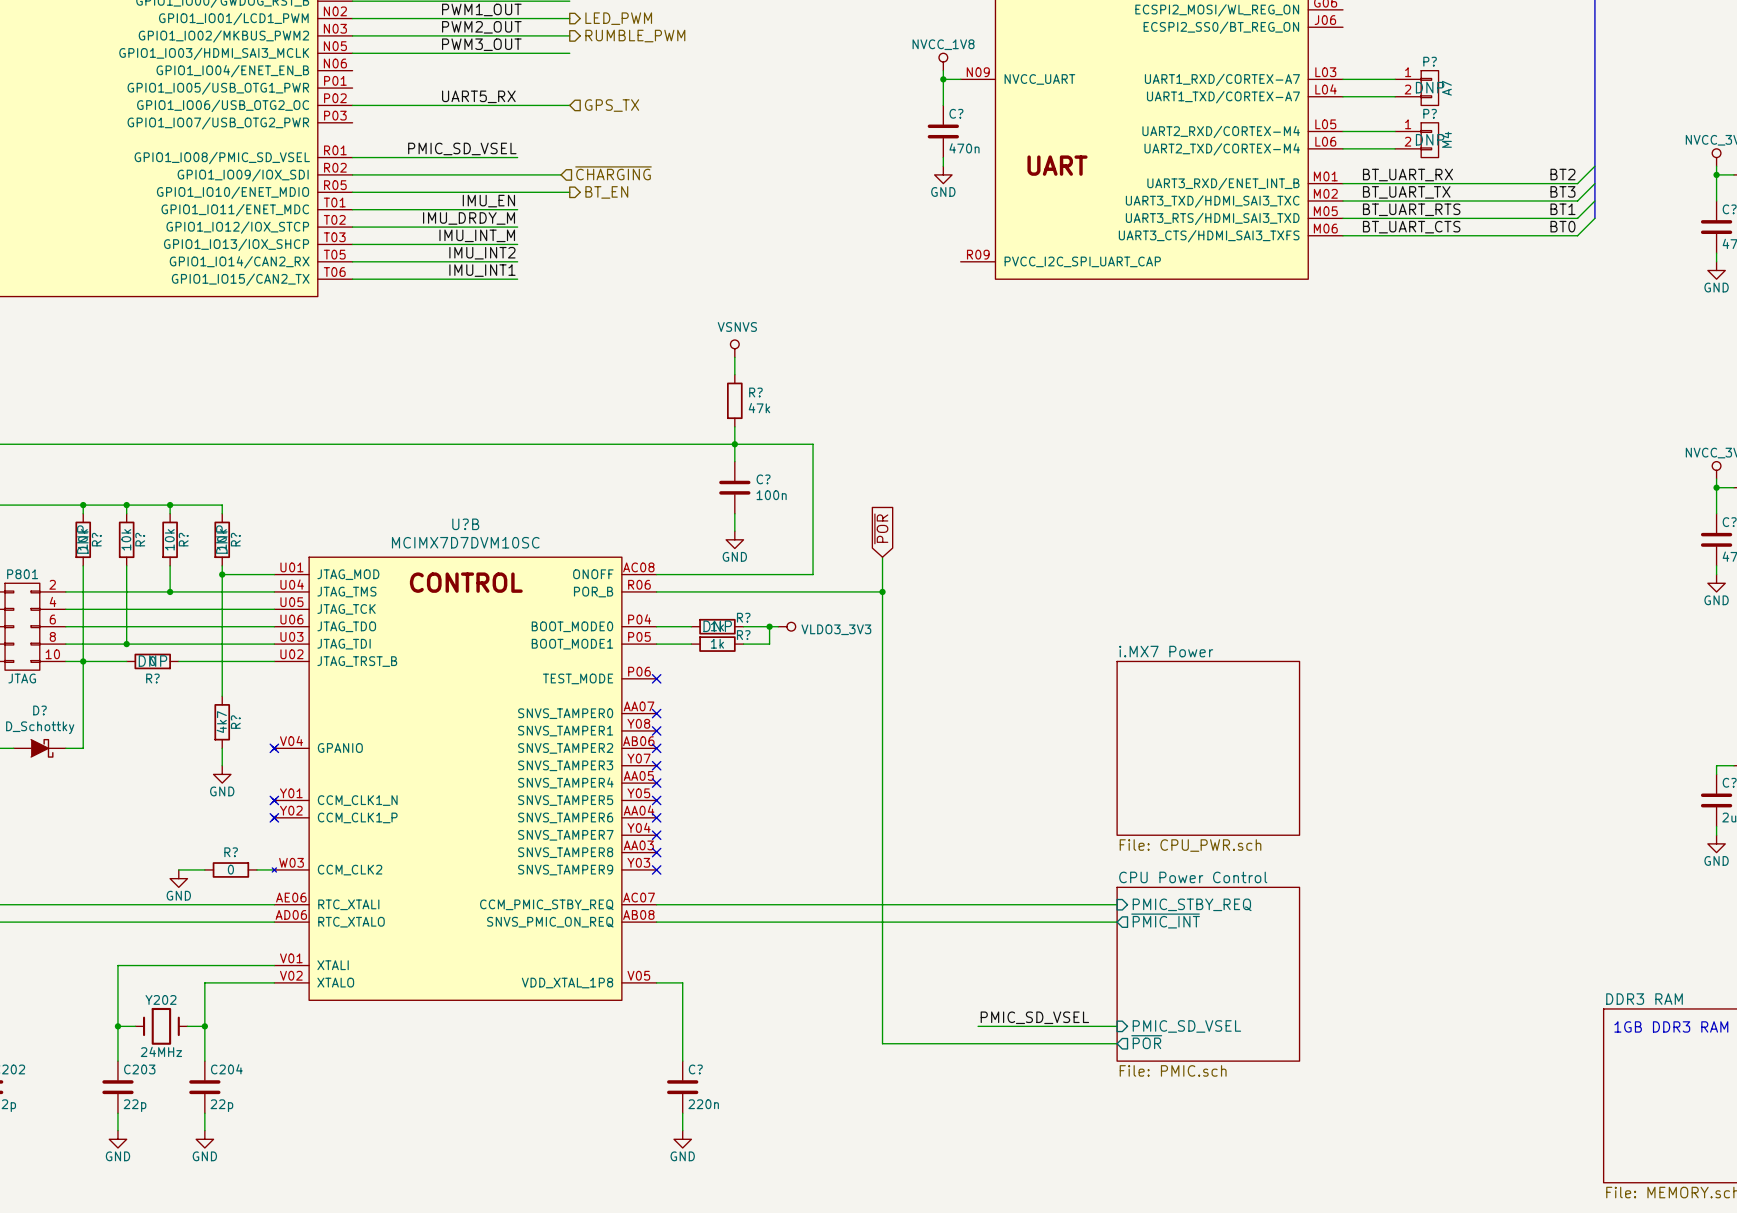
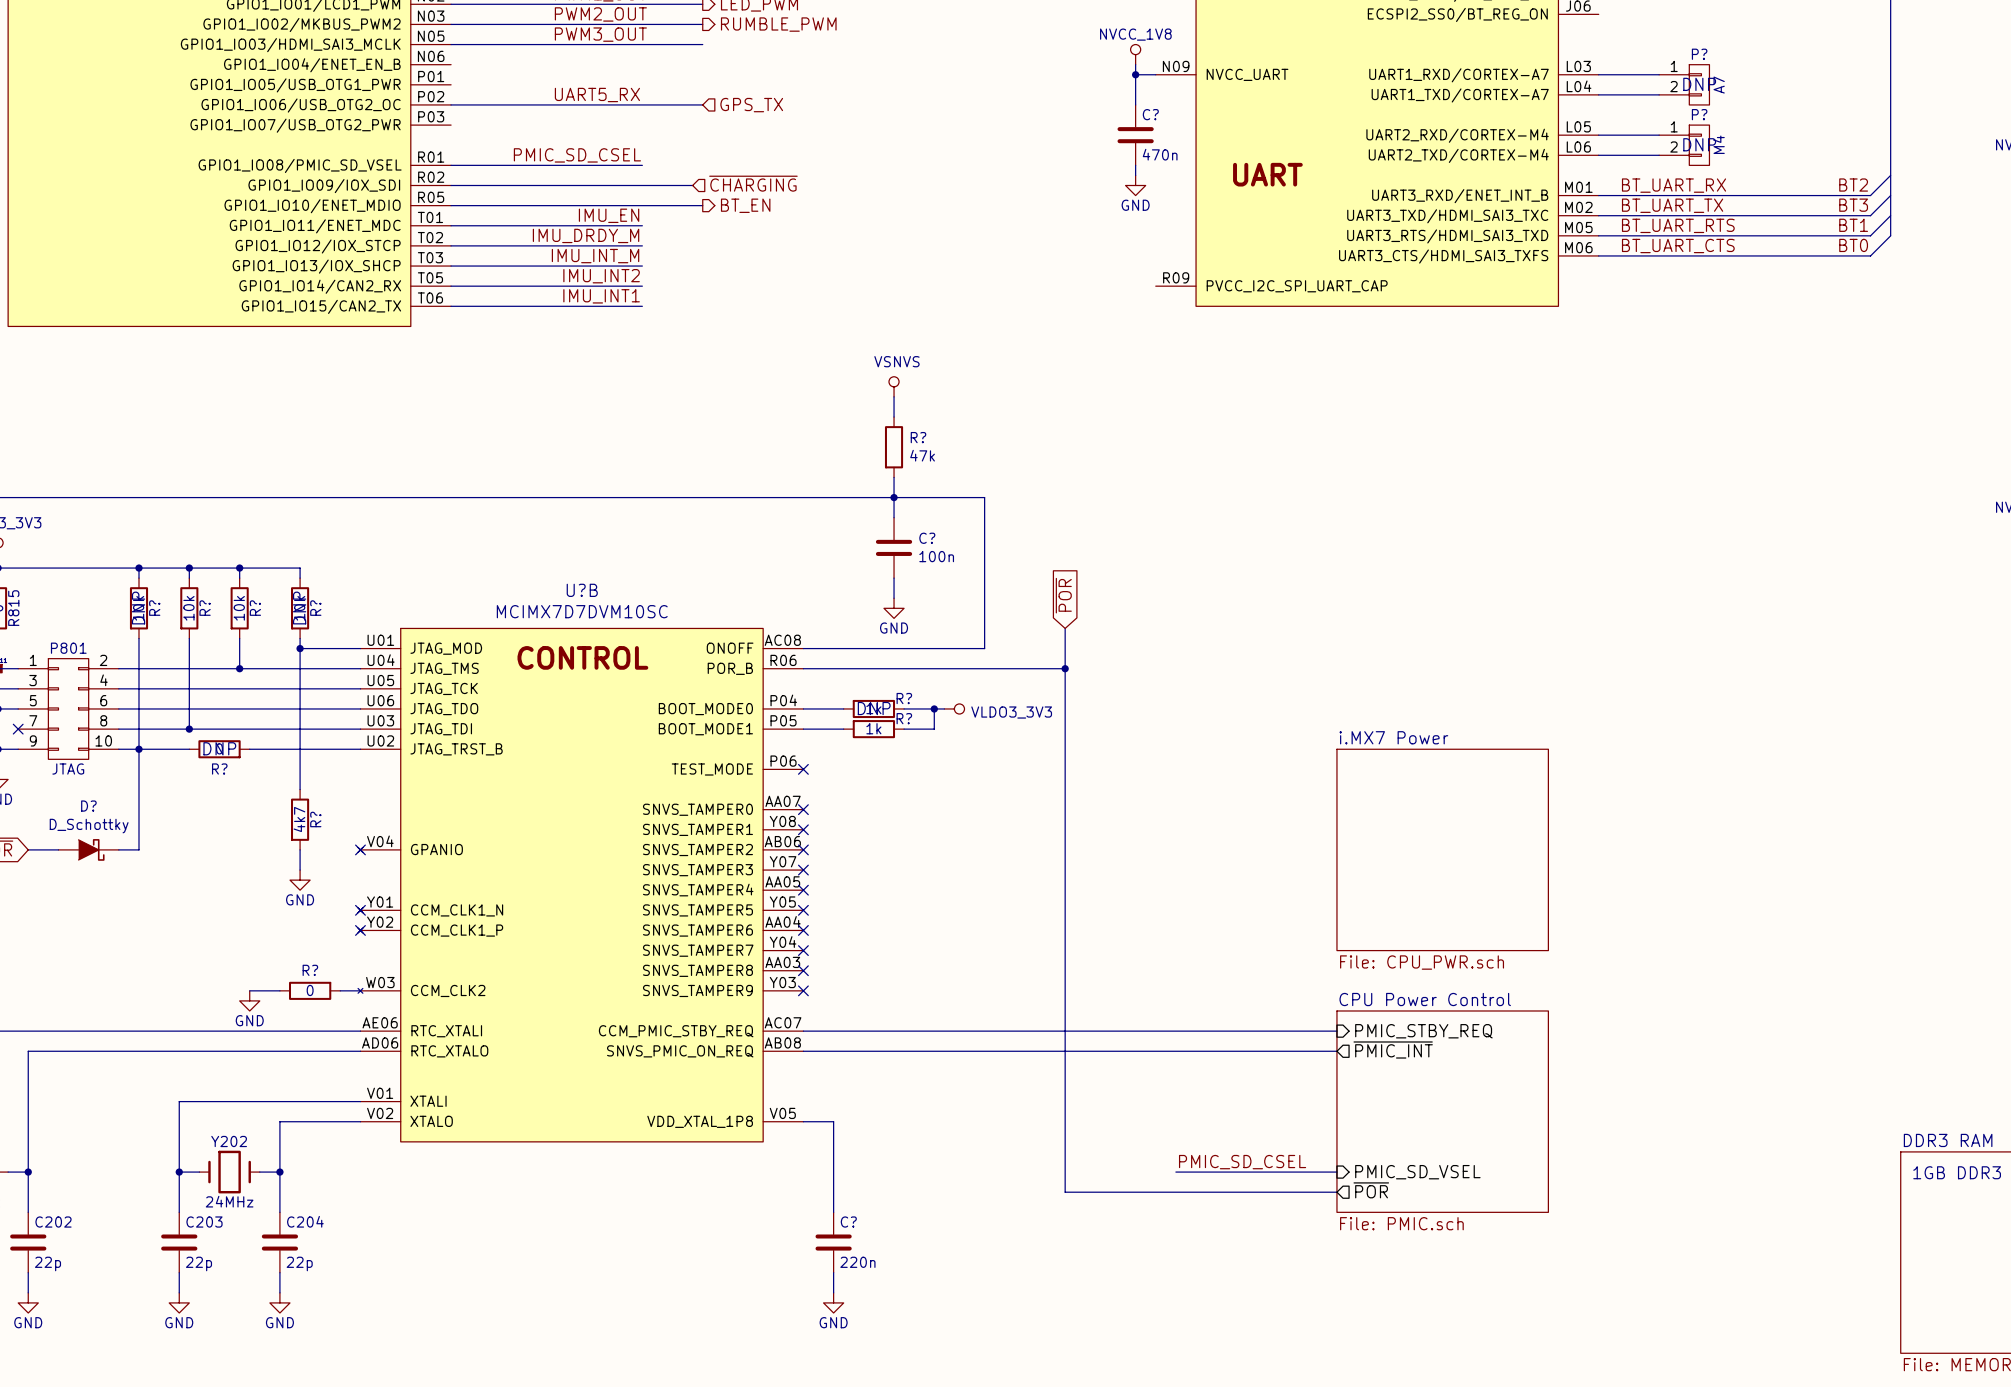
label: PMIC_SD_VSEL (462, 148) -> PMIC_SD_CSEL (577, 155)
label: PMIC_SD_VSEL (1034, 1017) -> PMIC_SD_CSEL (1242, 1162)

